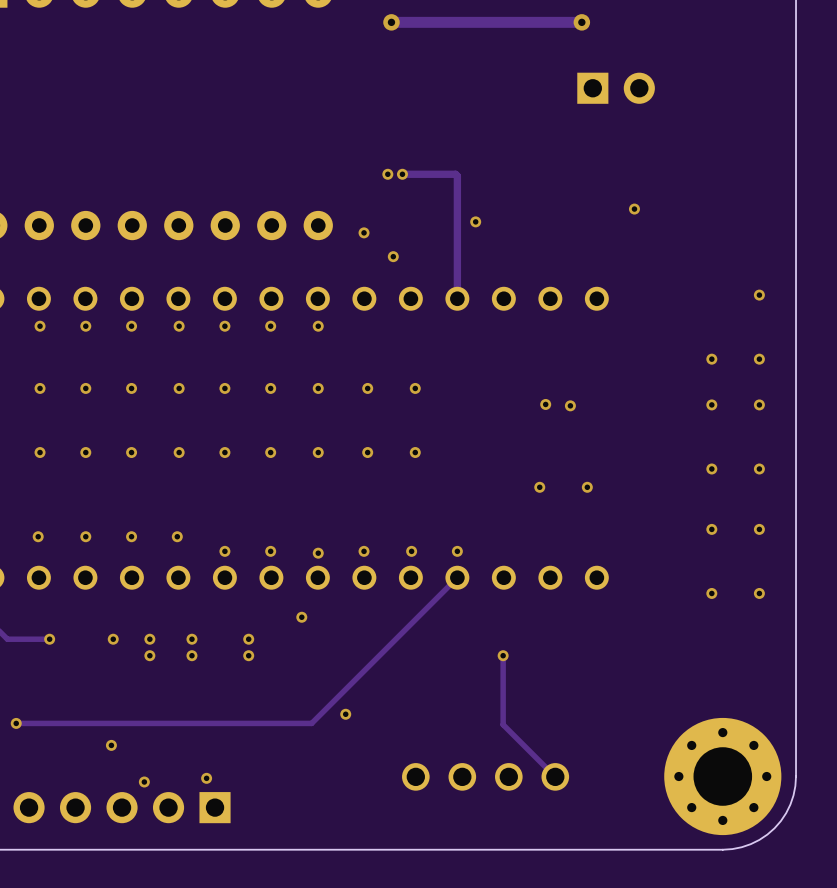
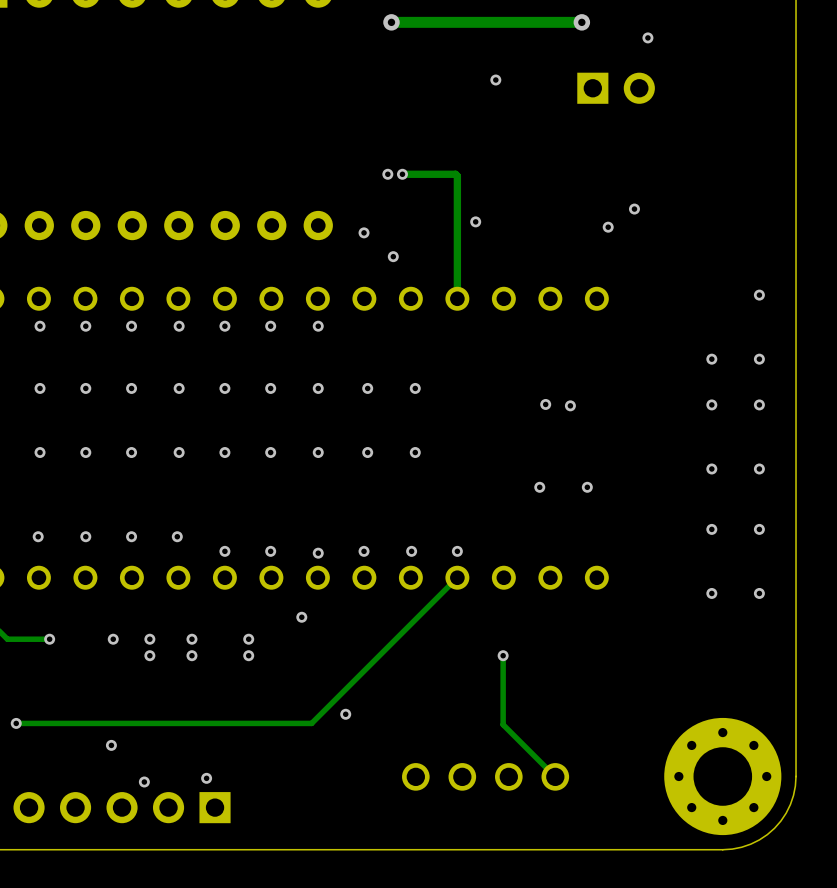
via: none -> (647, 37)
via: none -> (495, 80)
via: none -> (608, 227)

